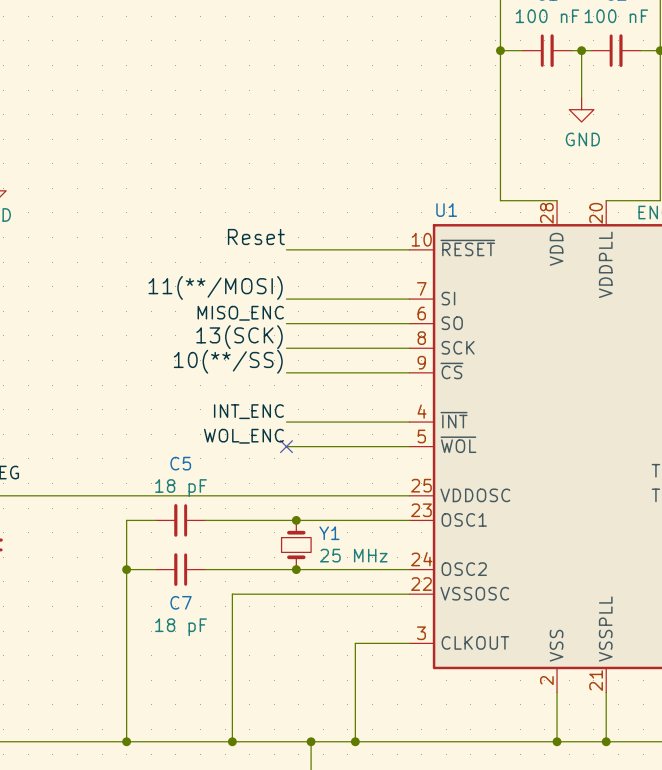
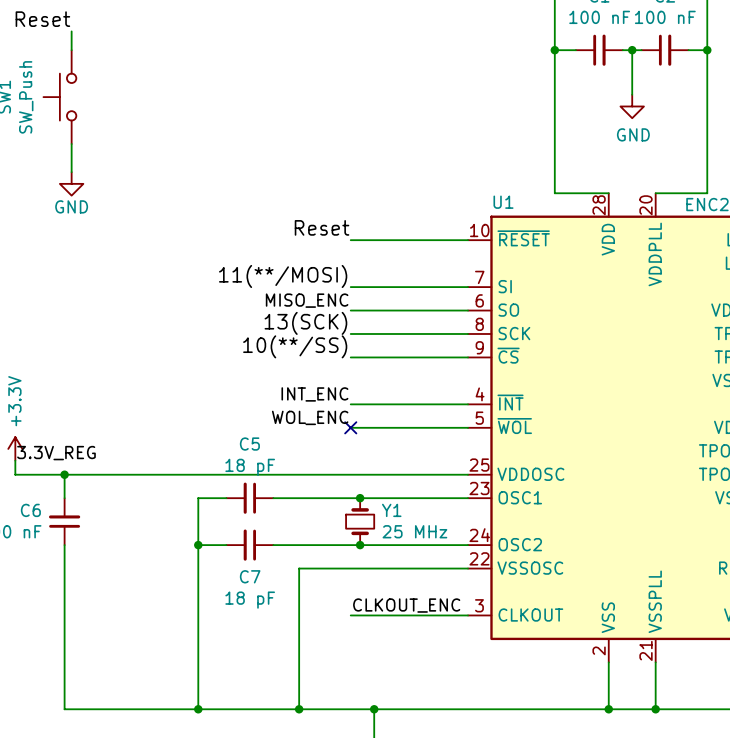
label: none -> CLKOUT_ENC (406, 605)
wire: (355, 643) (355, 741) -> (416, 615) (350, 615)
junction: (355, 741) -> none

